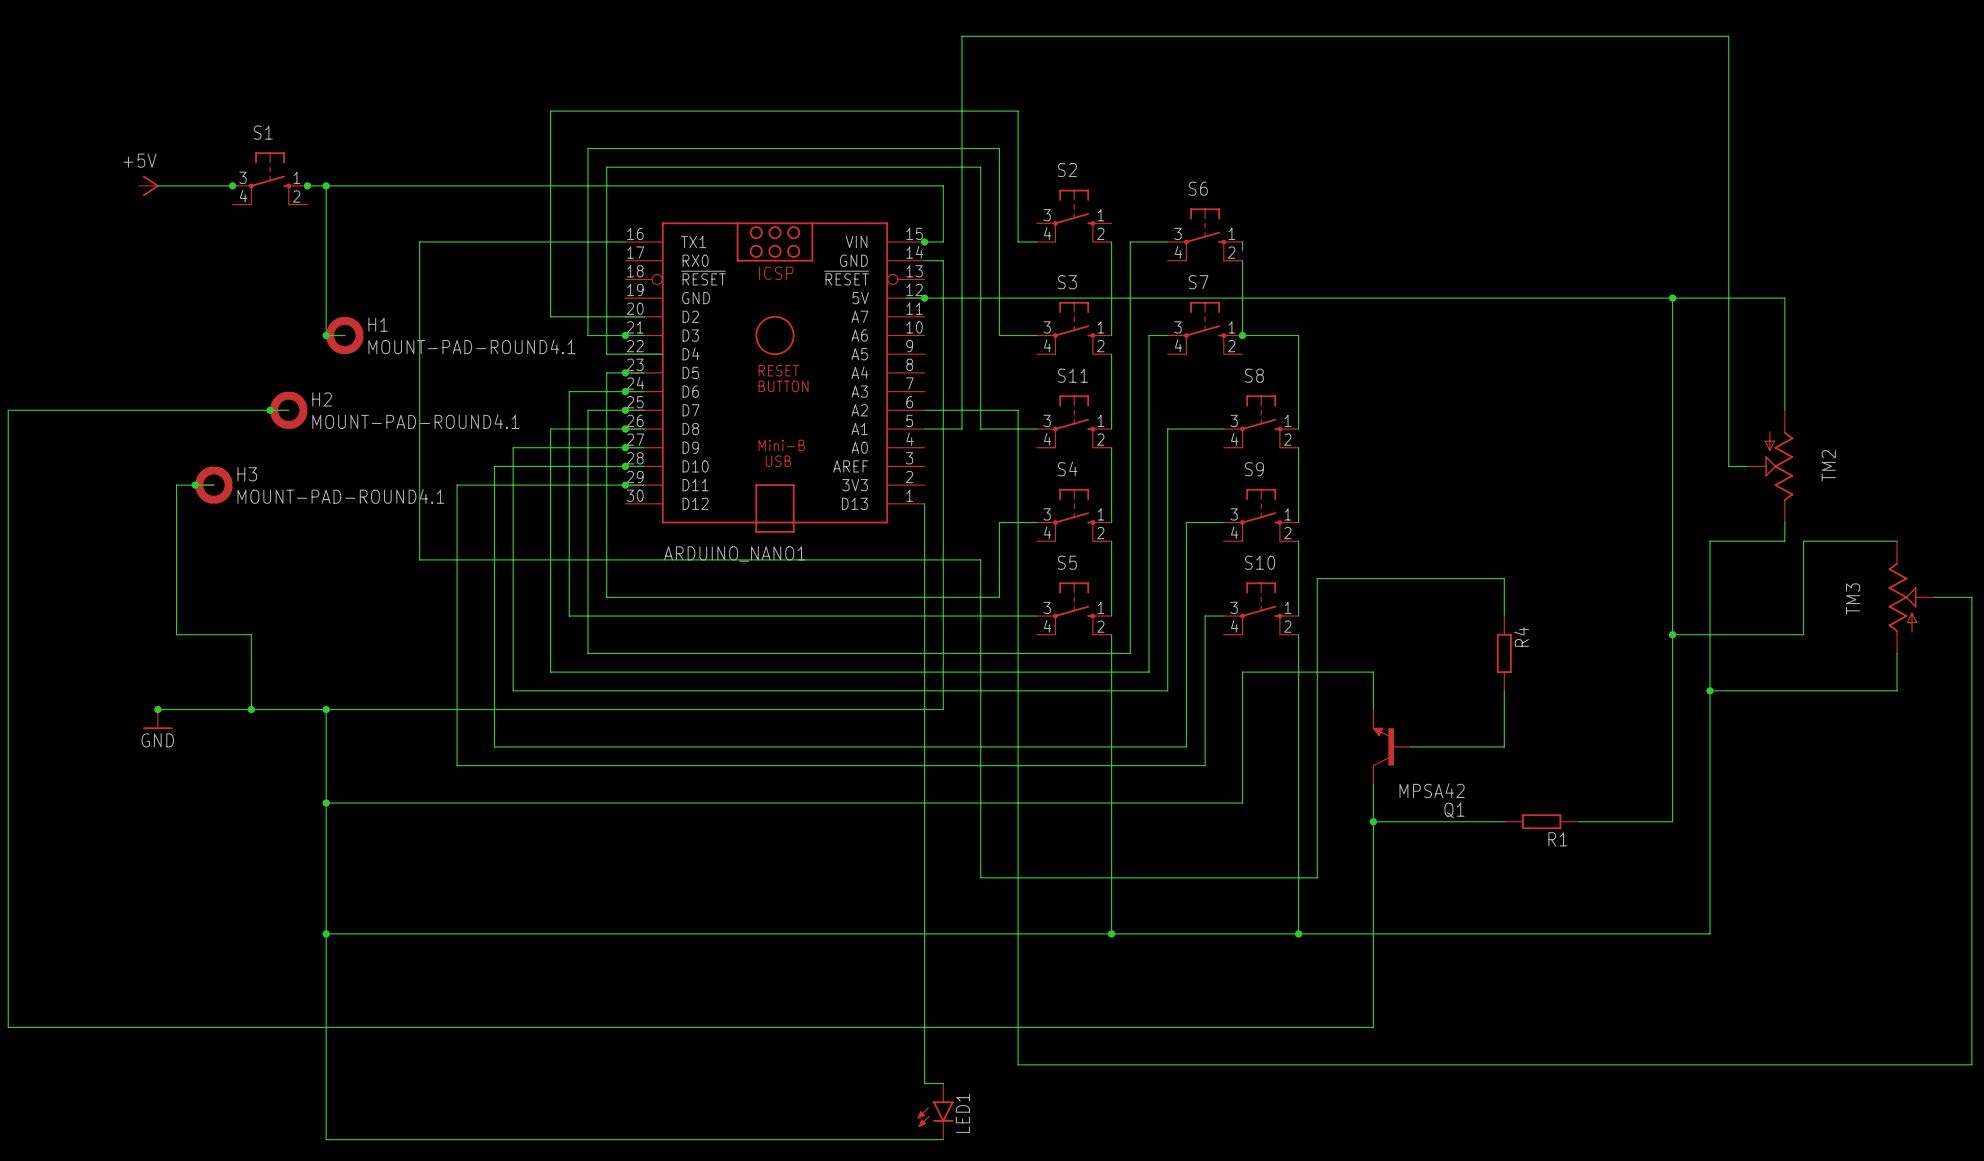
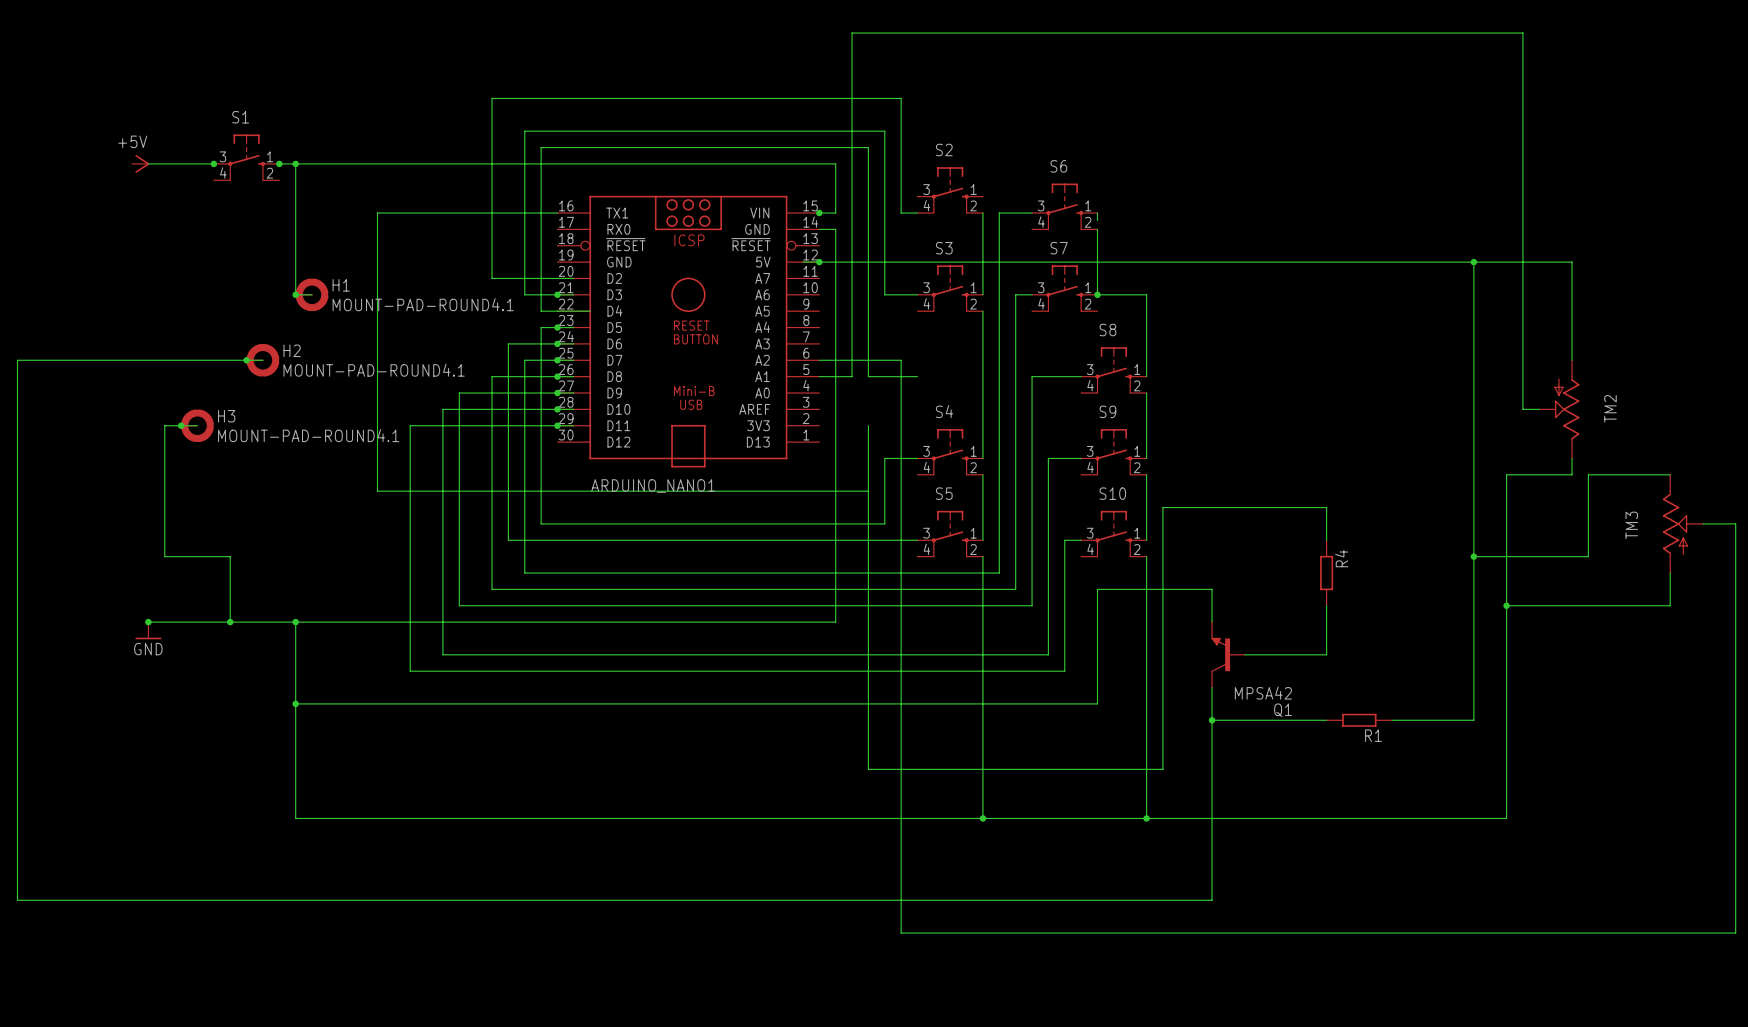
S11: (1074, 421) -> none
wire: none -> (982, 376) (982, 393)
wire: none -> (868, 425) (868, 491)
wire: (924, 503) (924, 1083) (943, 1083) -> none
wire: (326, 933) (326, 1139) (943, 1139) -> none
junction: (326, 933) -> none
LED1: (935, 1111) -> none

